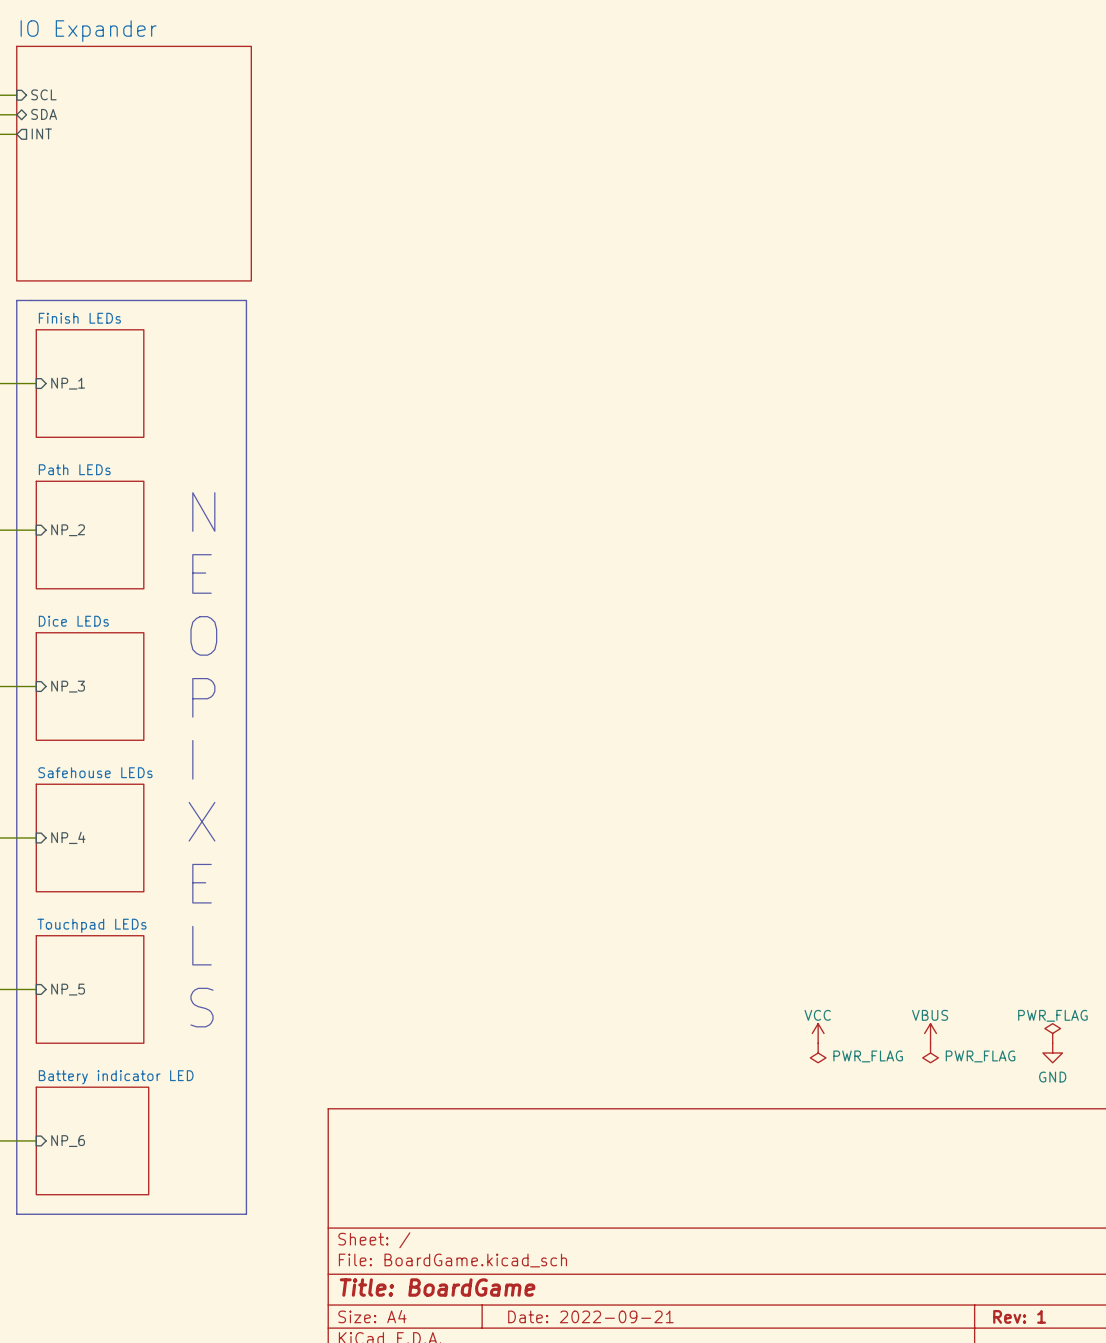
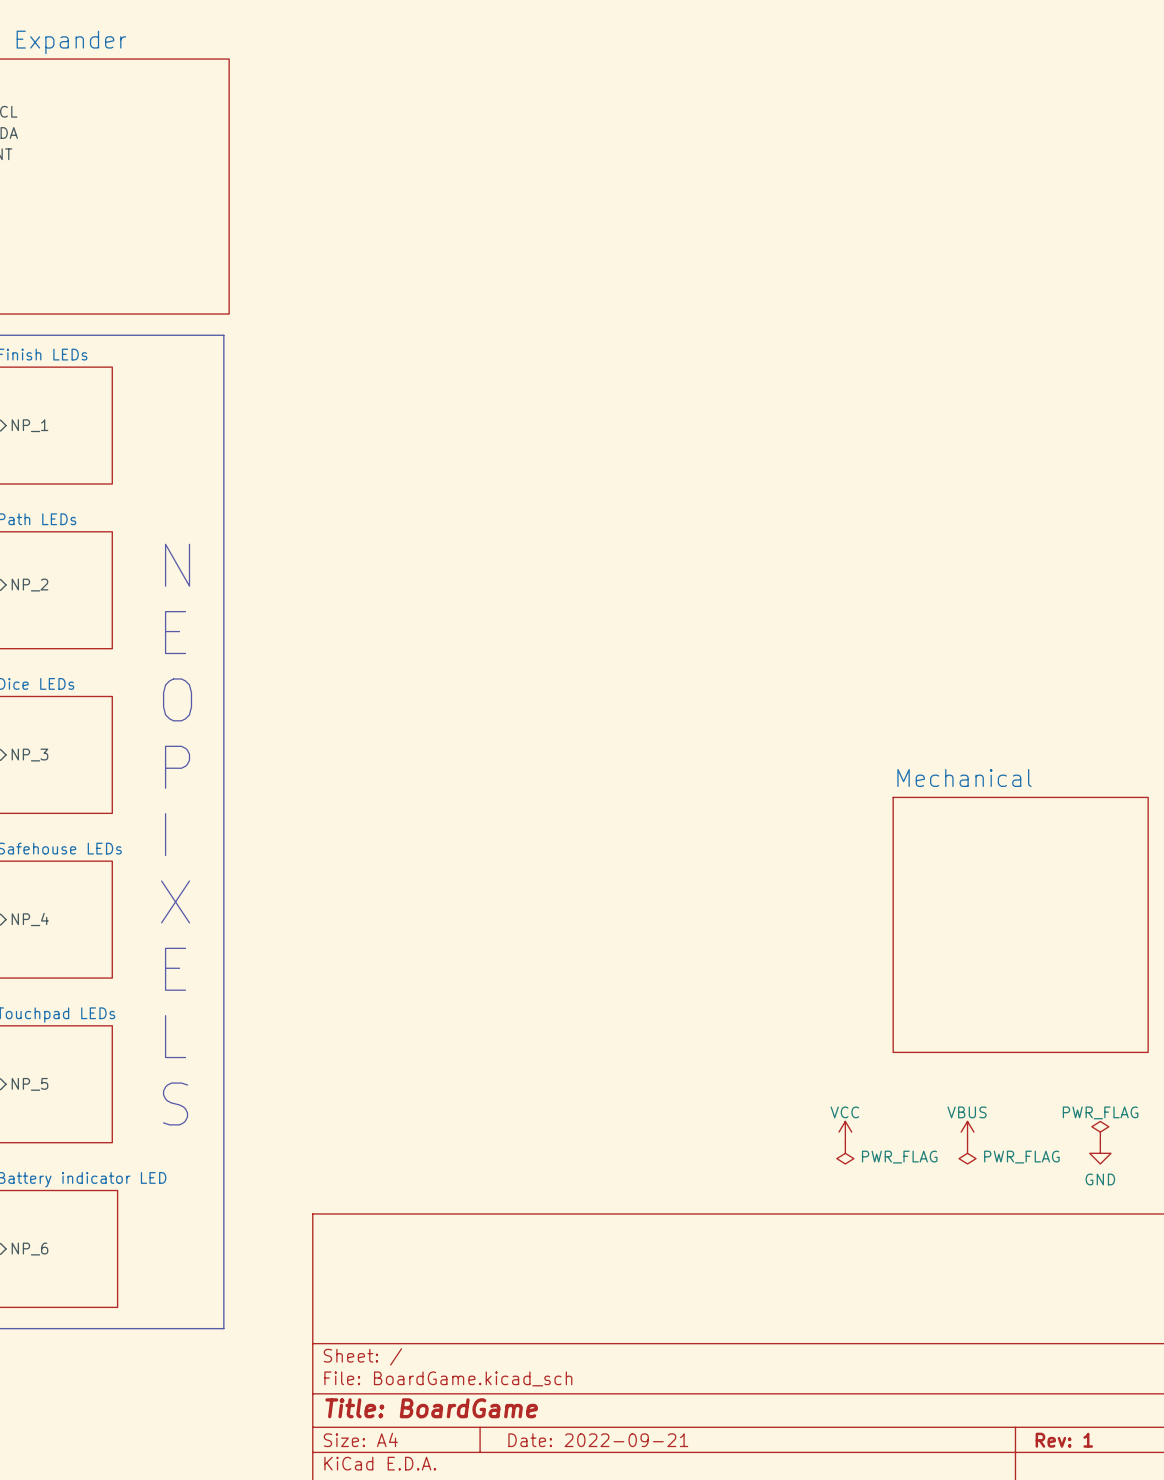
sheet Mechanical: none -> (1020, 924)

